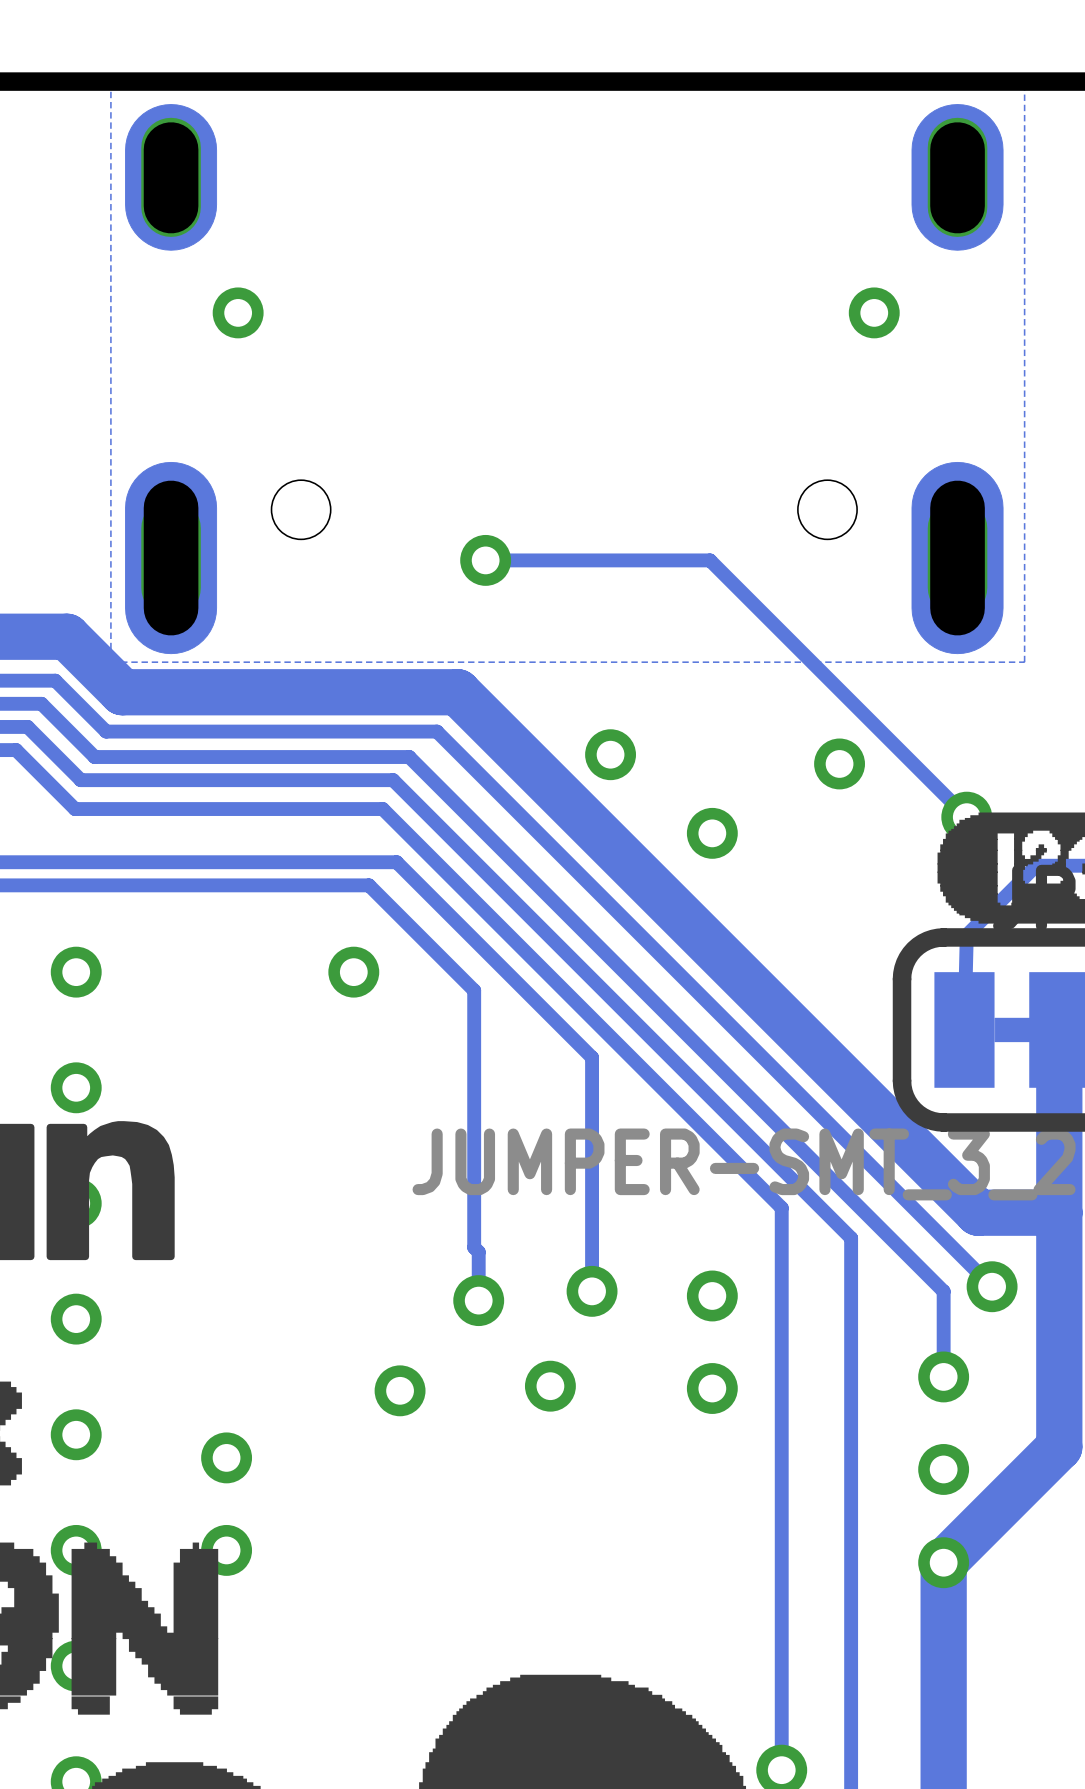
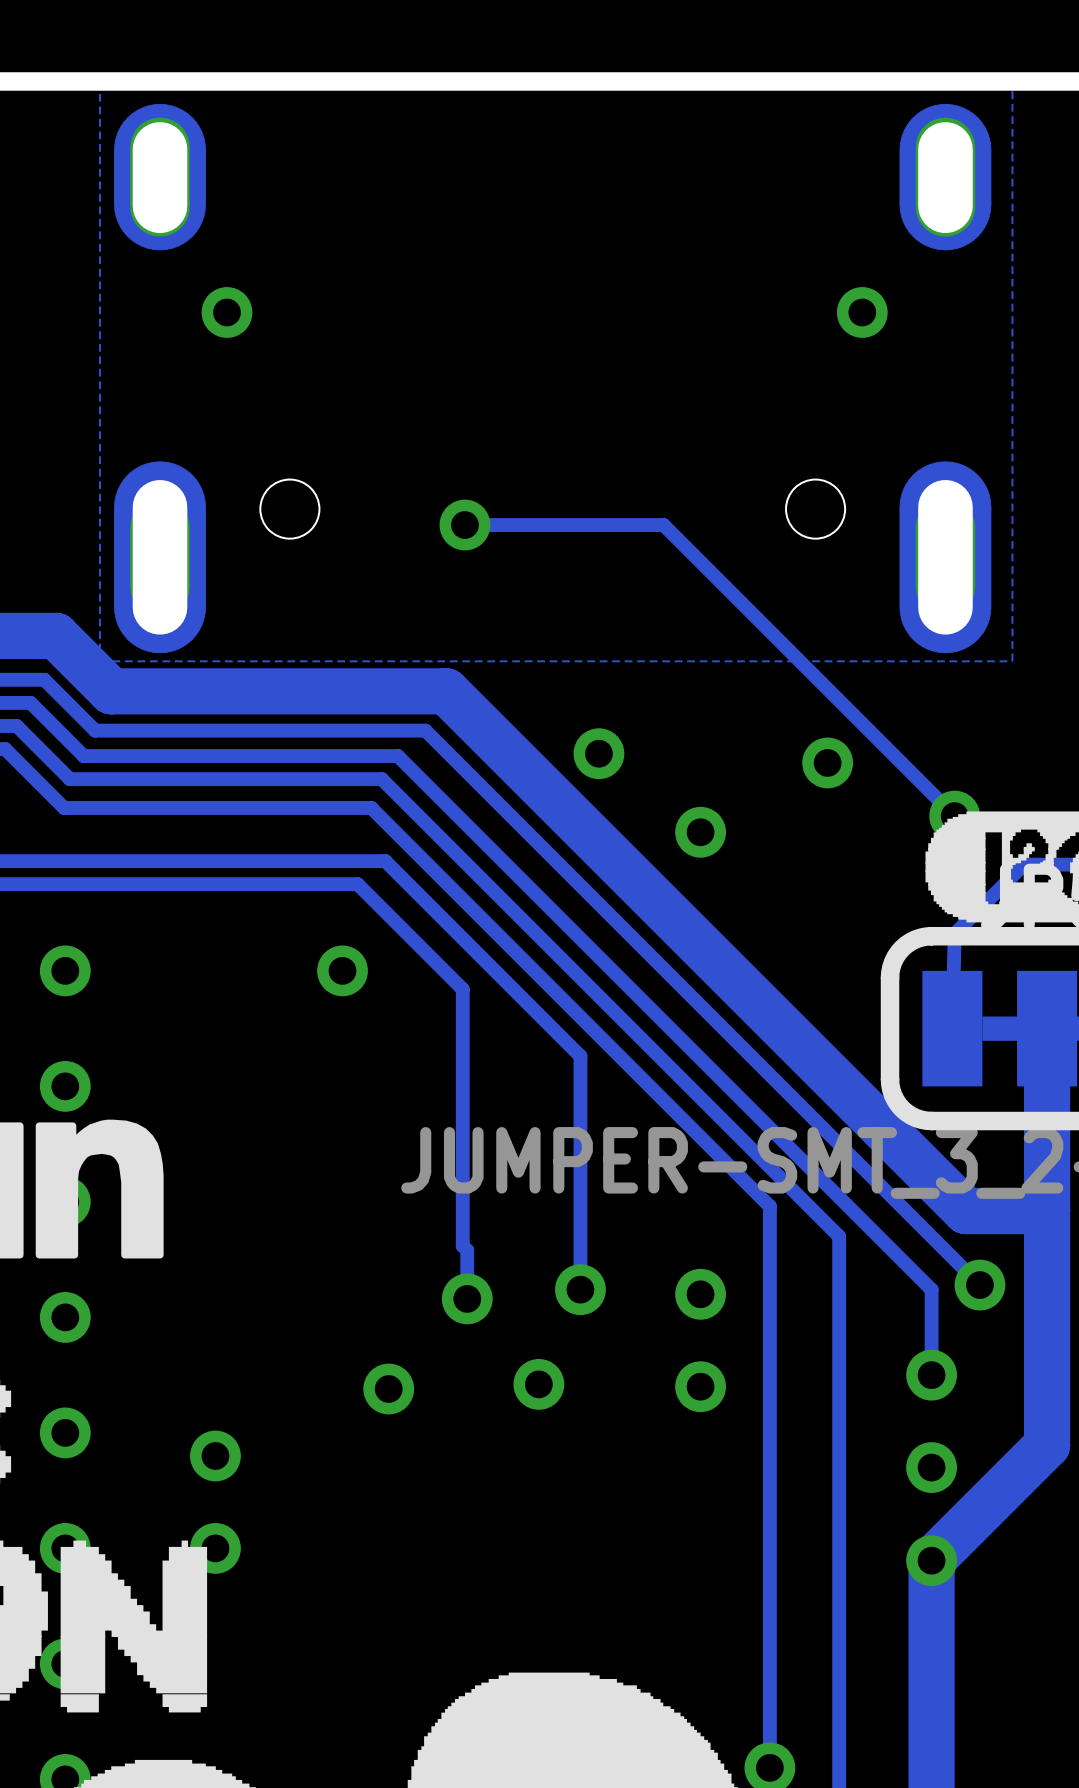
via position: (485, 560) -> (464, 525)
track: (710, 560) (485, 560) -> (698, 559) (663, 525) (464, 525)

